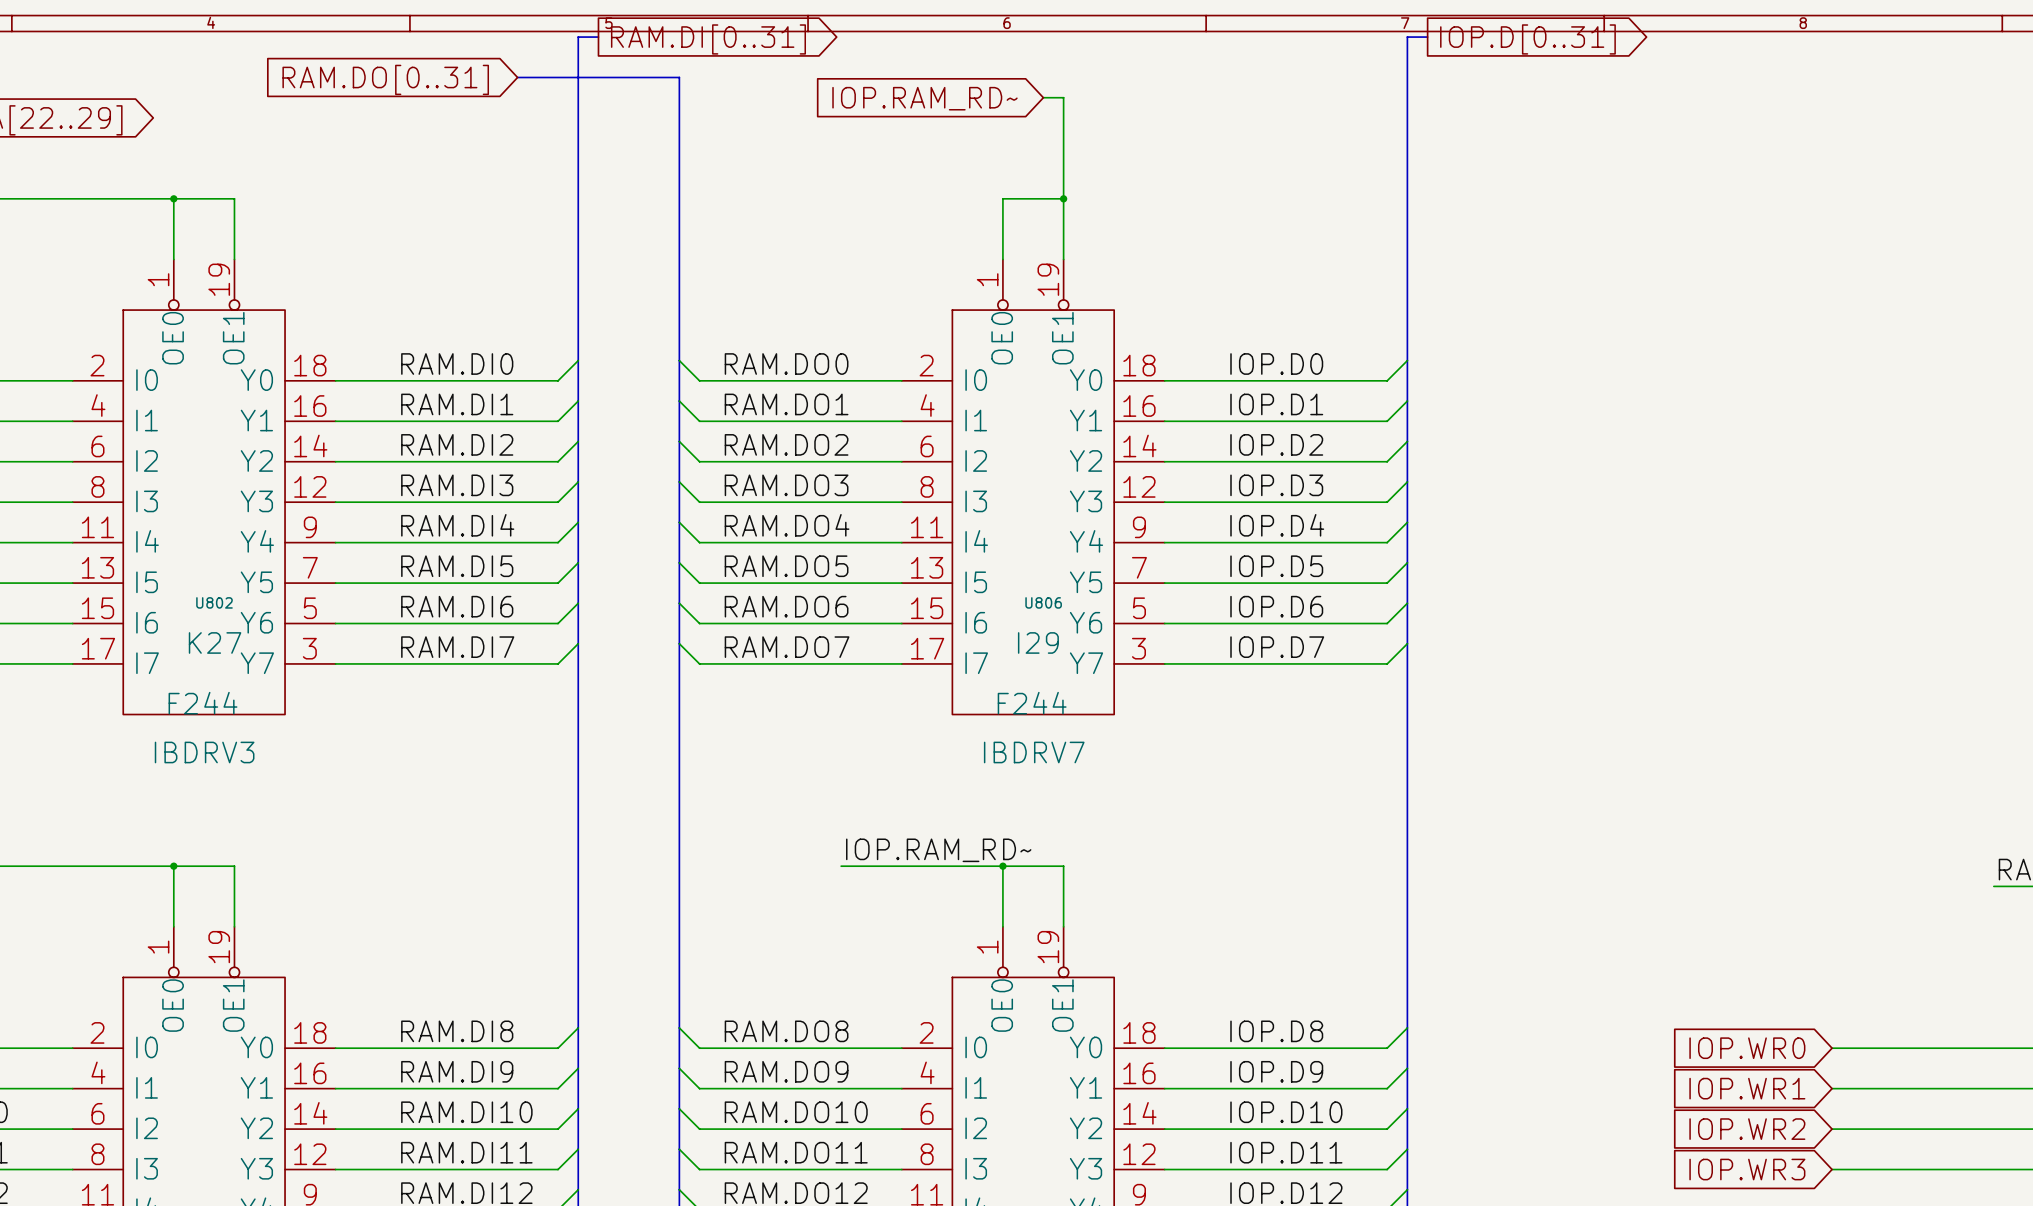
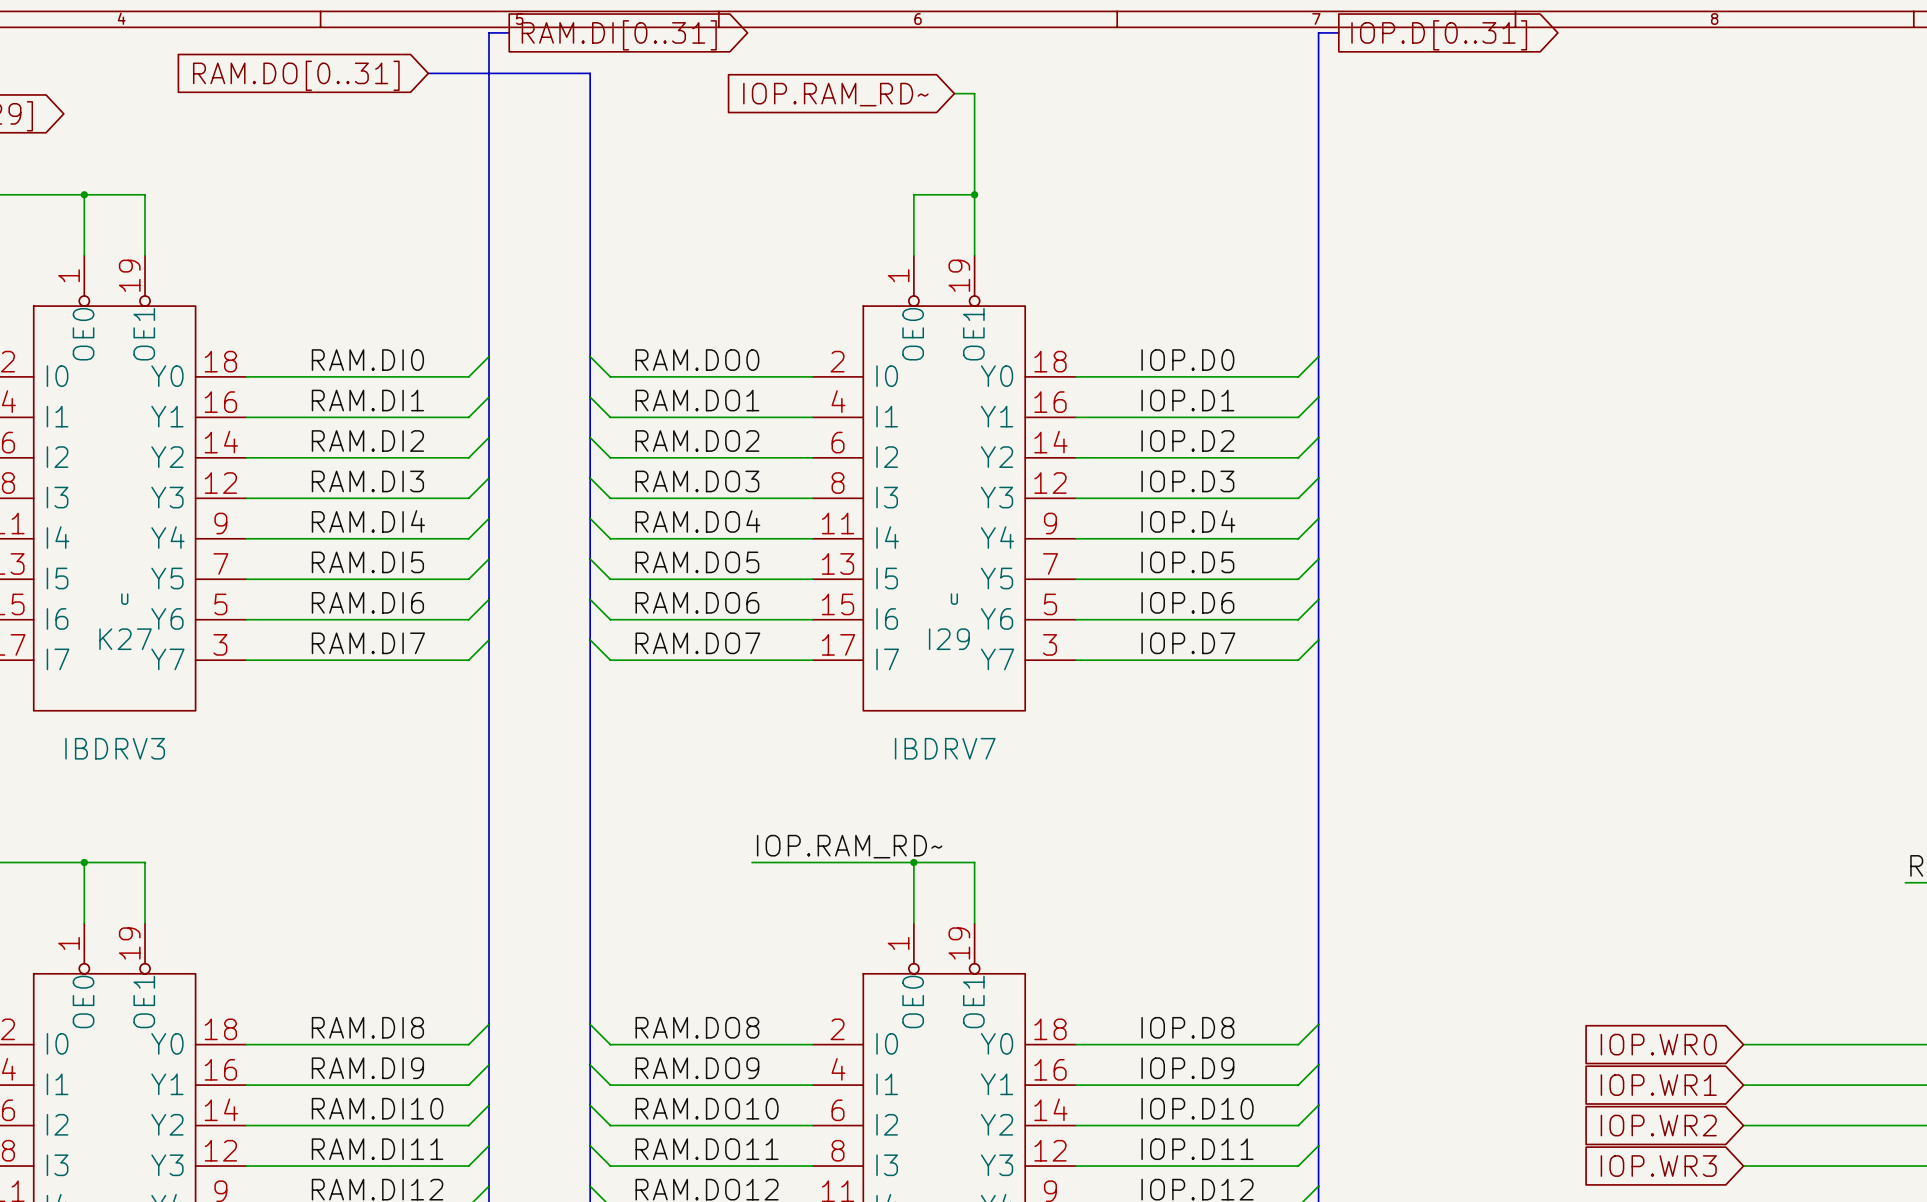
U802 name: U802 (214, 602) -> U (124, 599)
U806 name: U806 (1043, 602) -> U (954, 599)
U802 value: F244 (203, 703) -> none
U806 value: F244 (1032, 703) -> none

